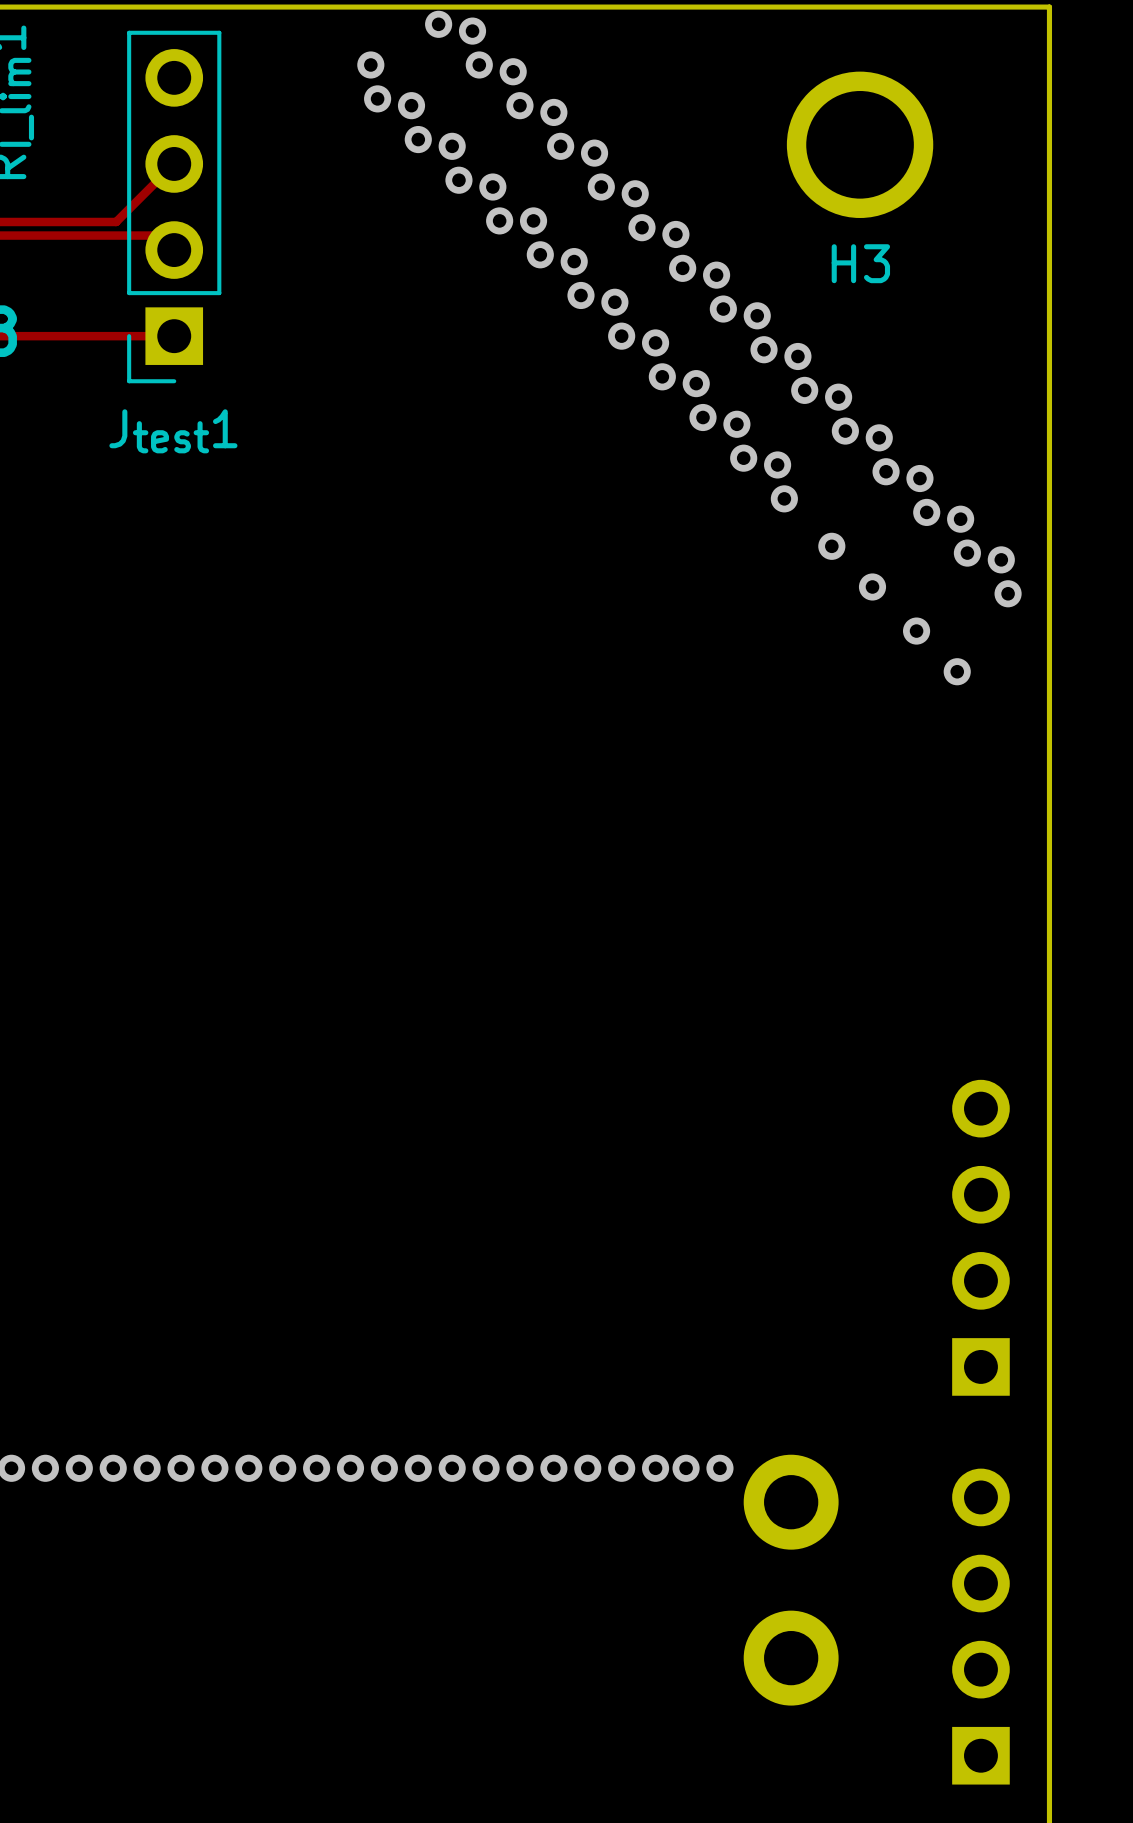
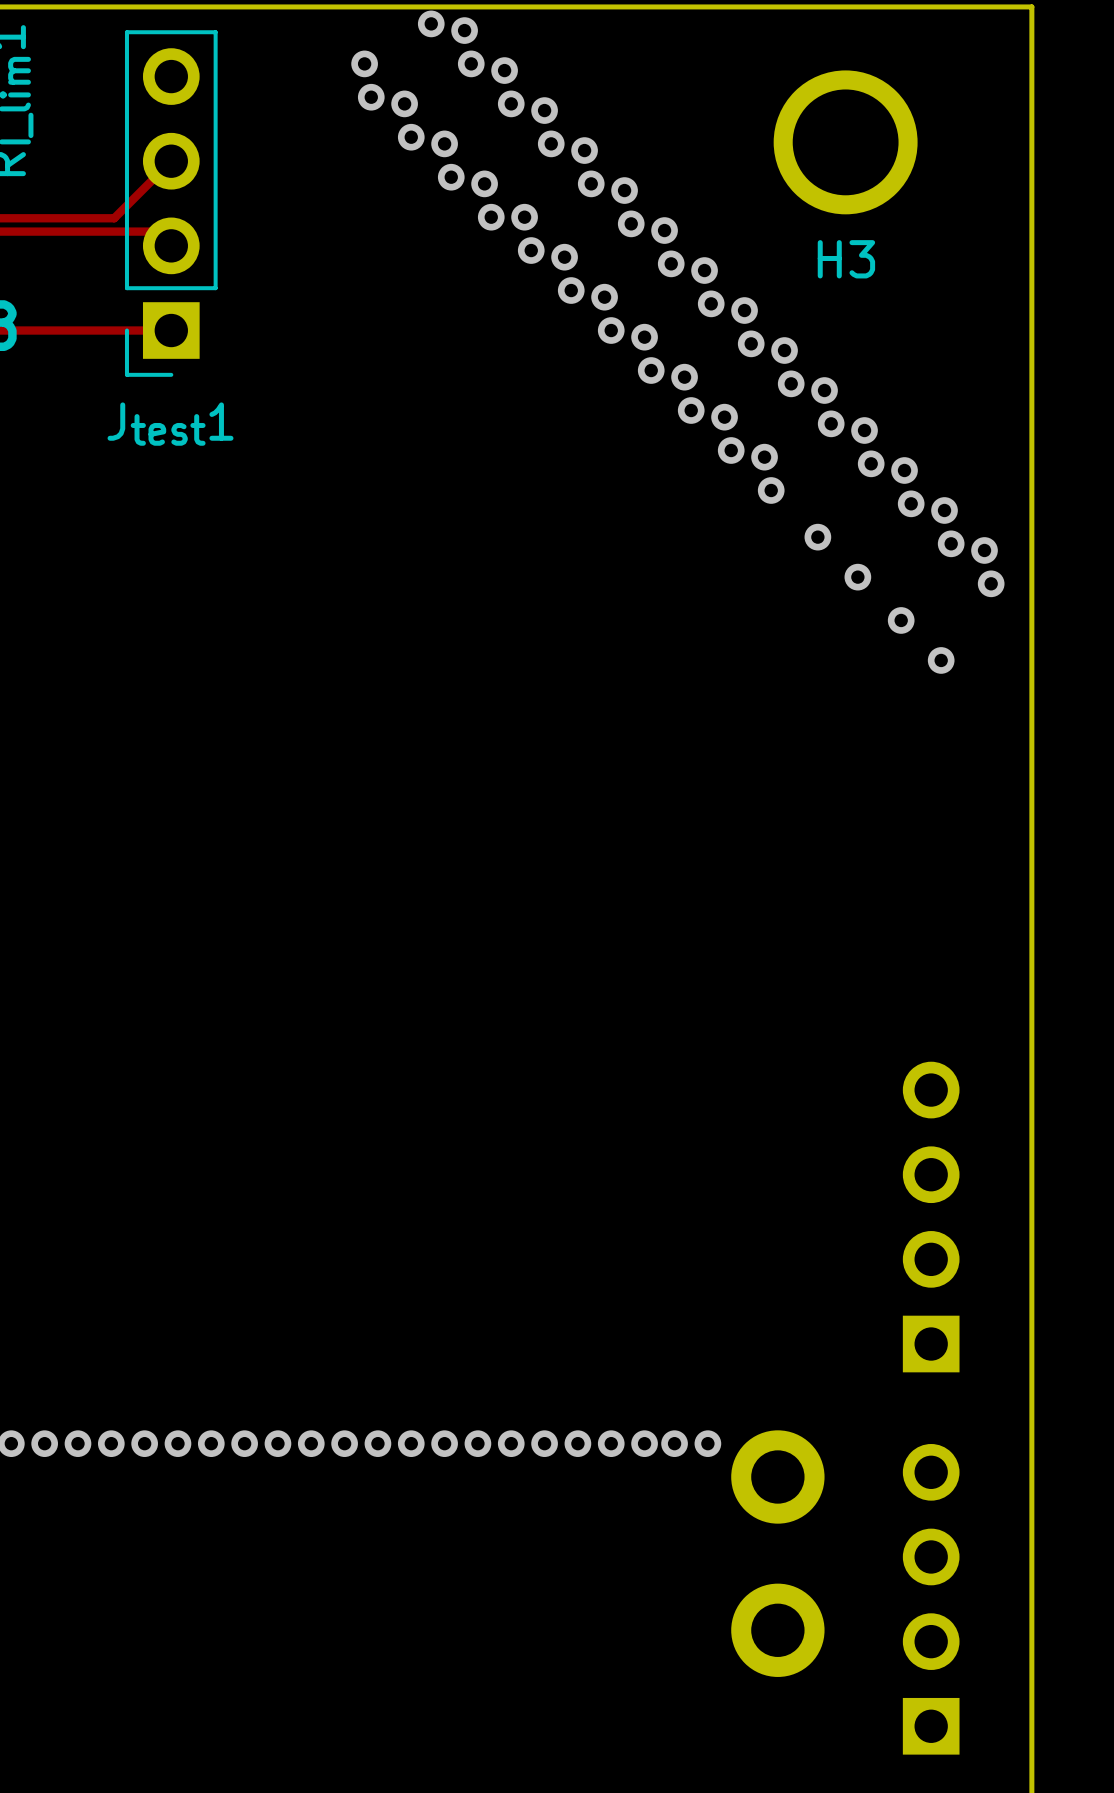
part position: (980, 1237) -> (931, 1217)
part position: (980, 1626) -> (931, 1599)

